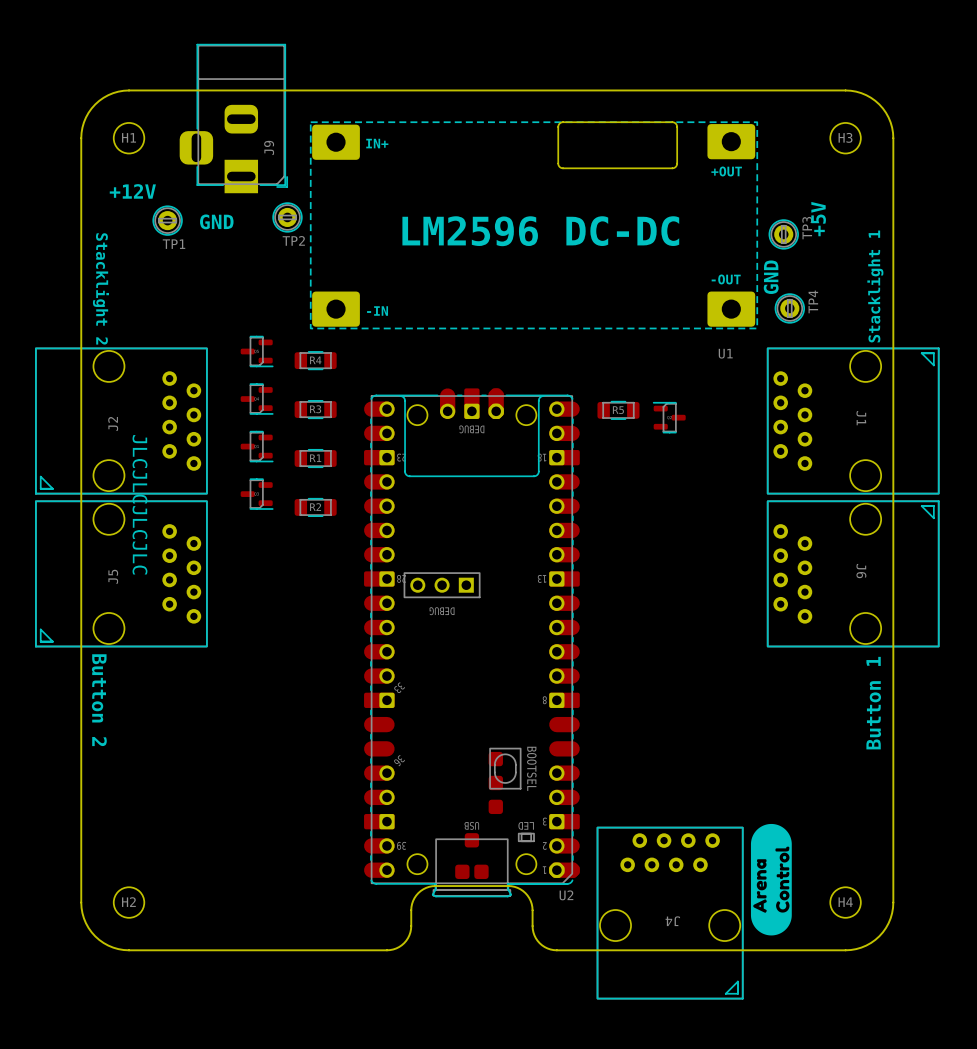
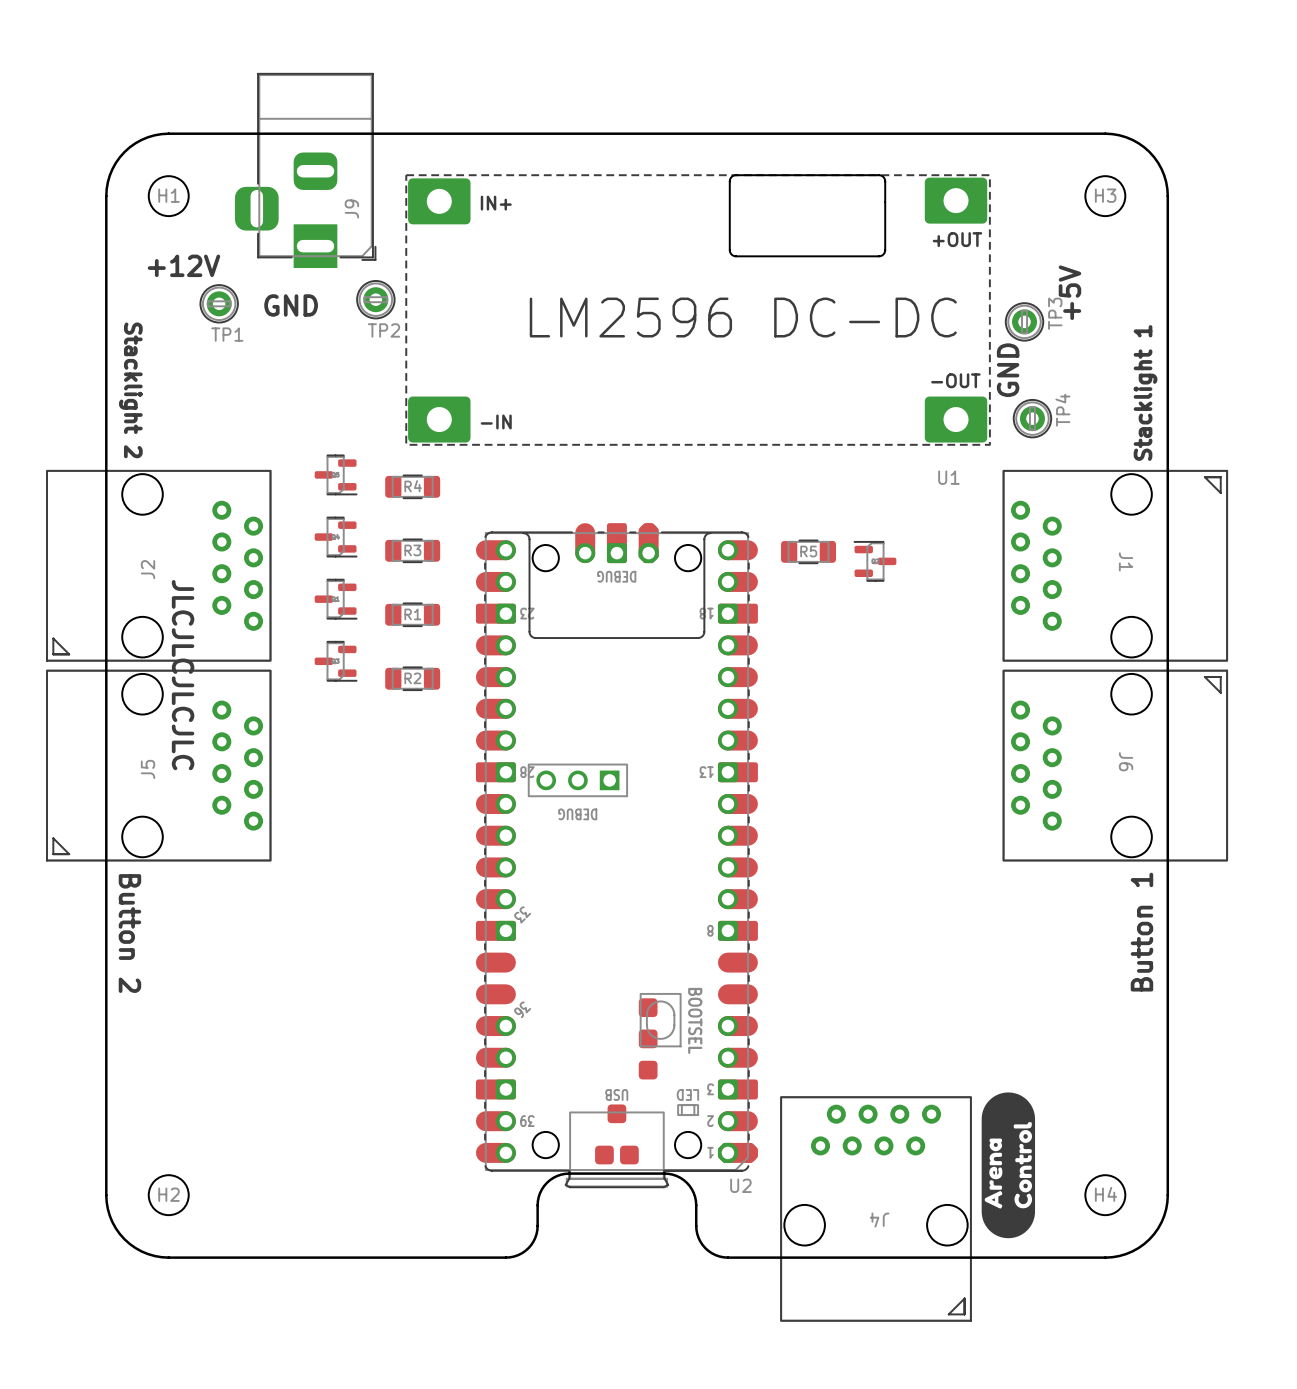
U1 footprint: [310, 121, 758, 330] -> [405, 174, 991, 446]

